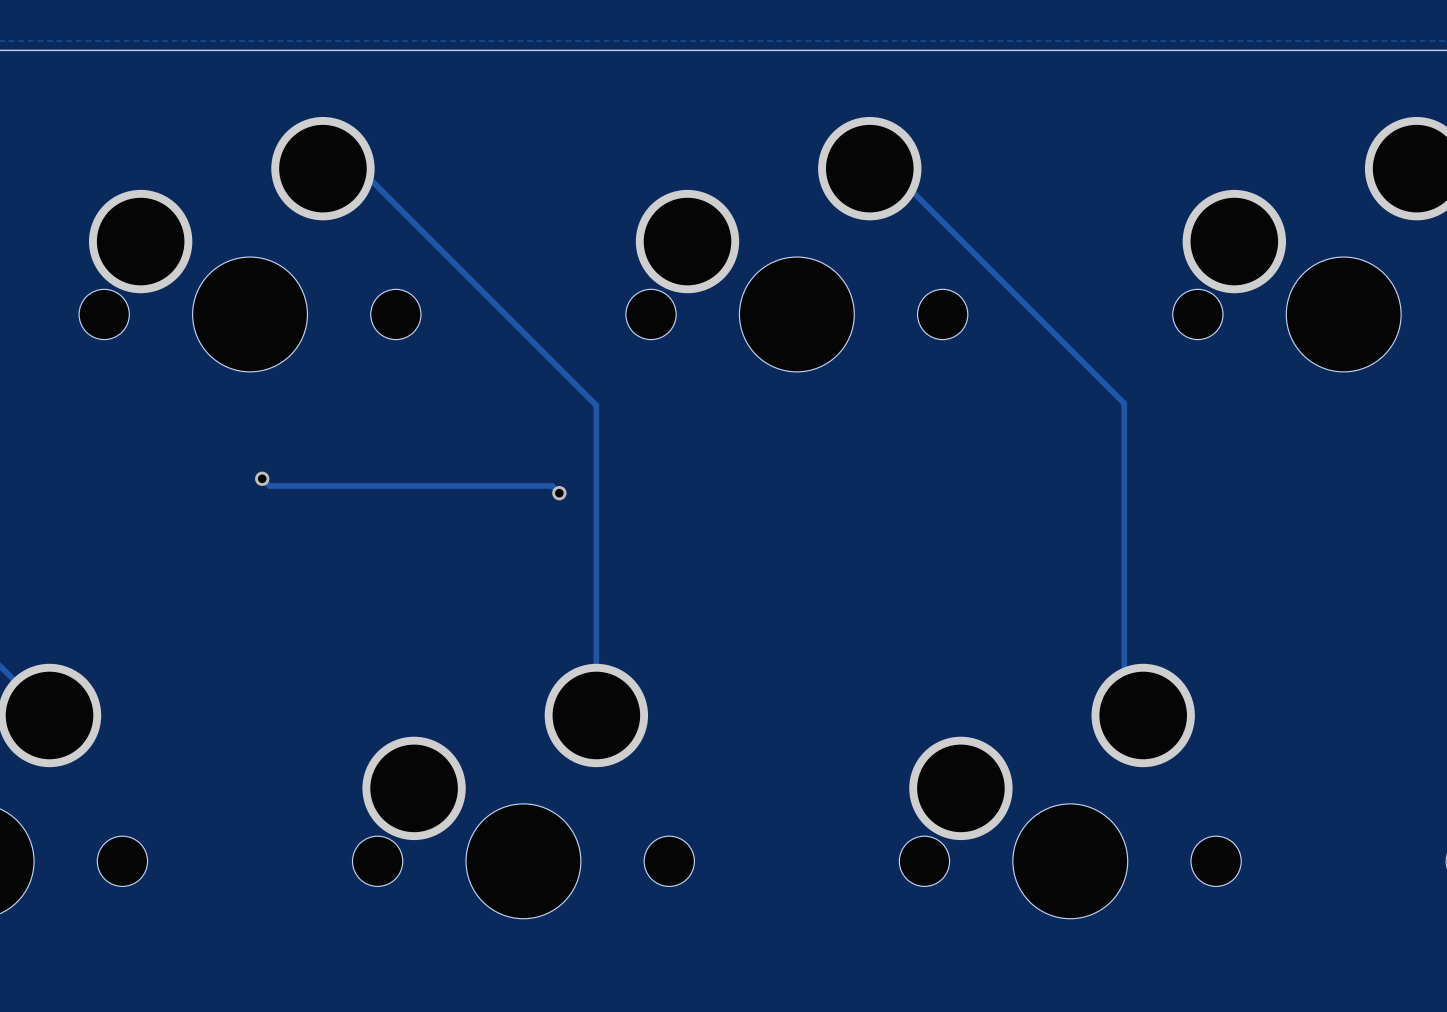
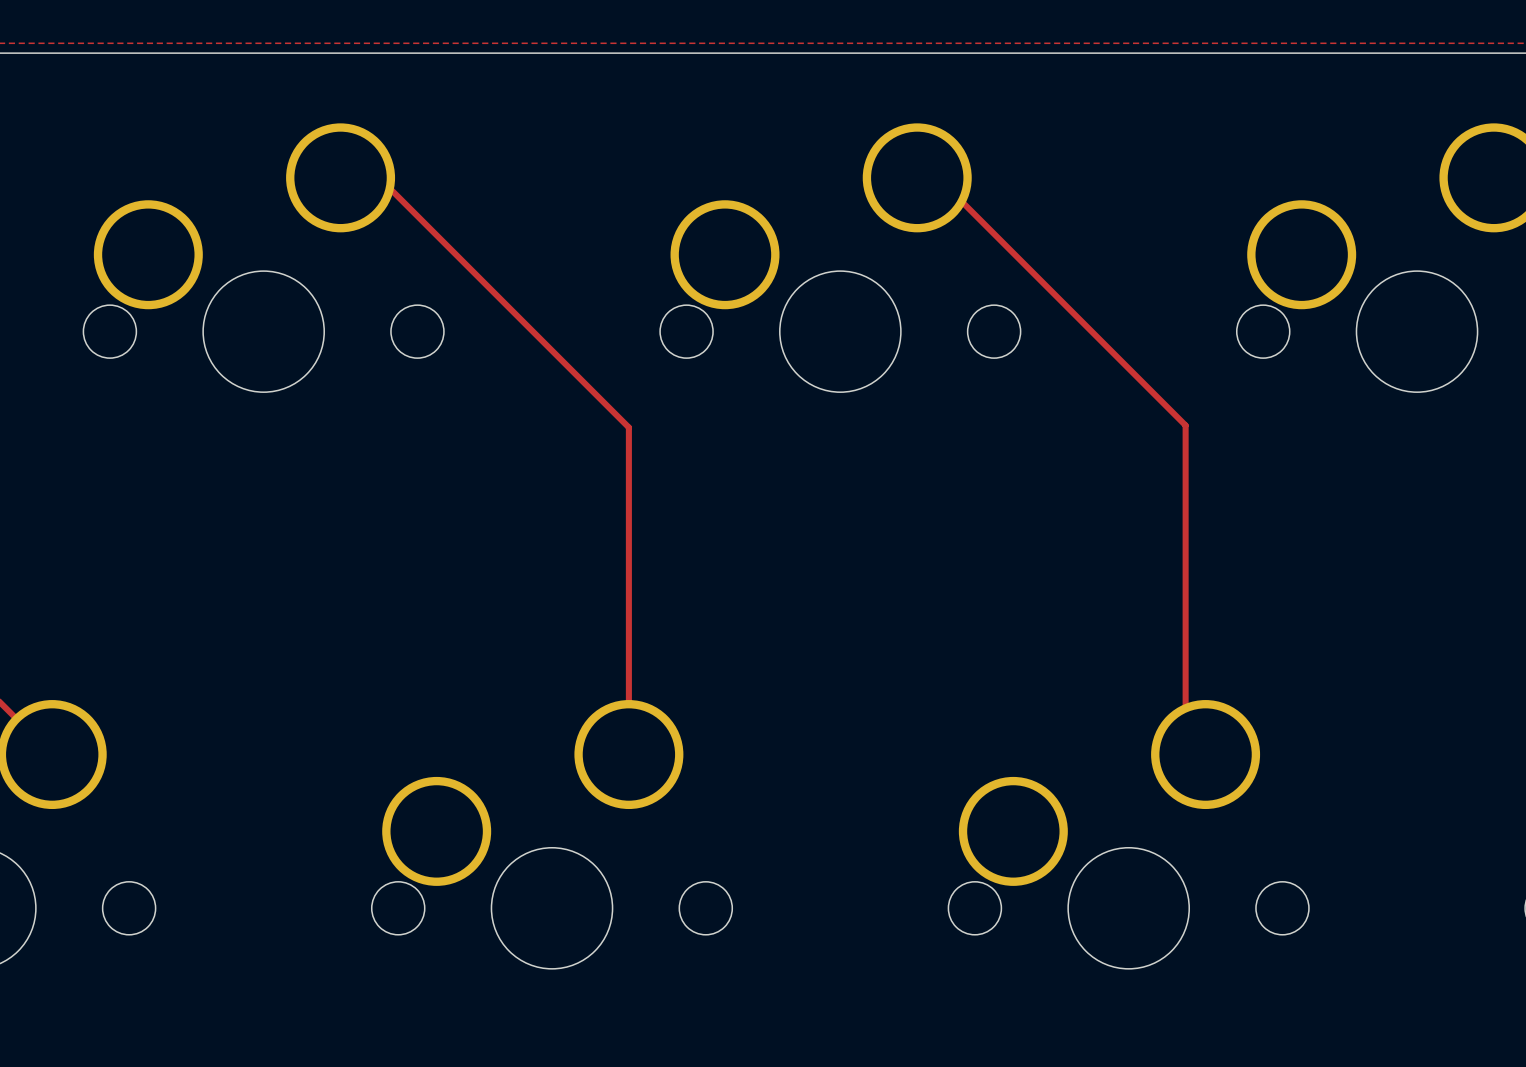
track: (262, 478) (269, 485) (552, 485) (559, 493) -> none
via: (262, 478) -> none
via: (559, 493) -> none

